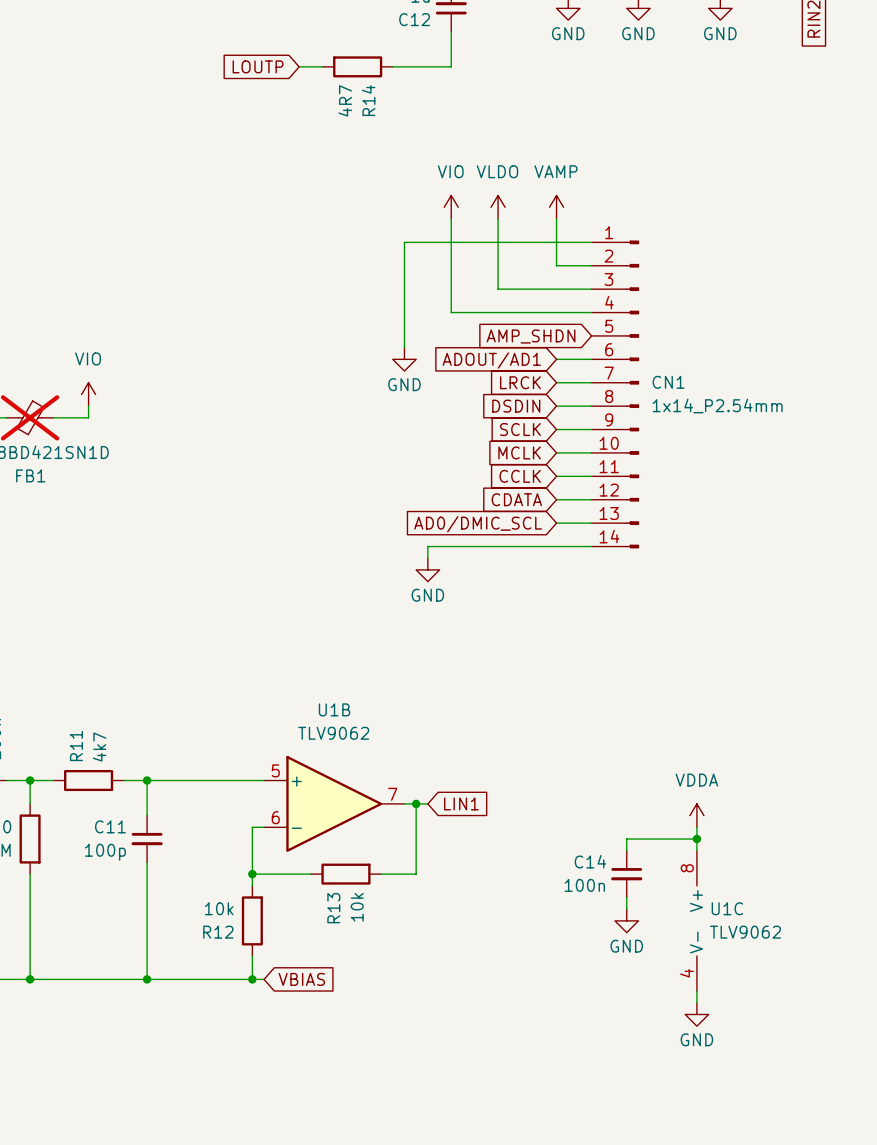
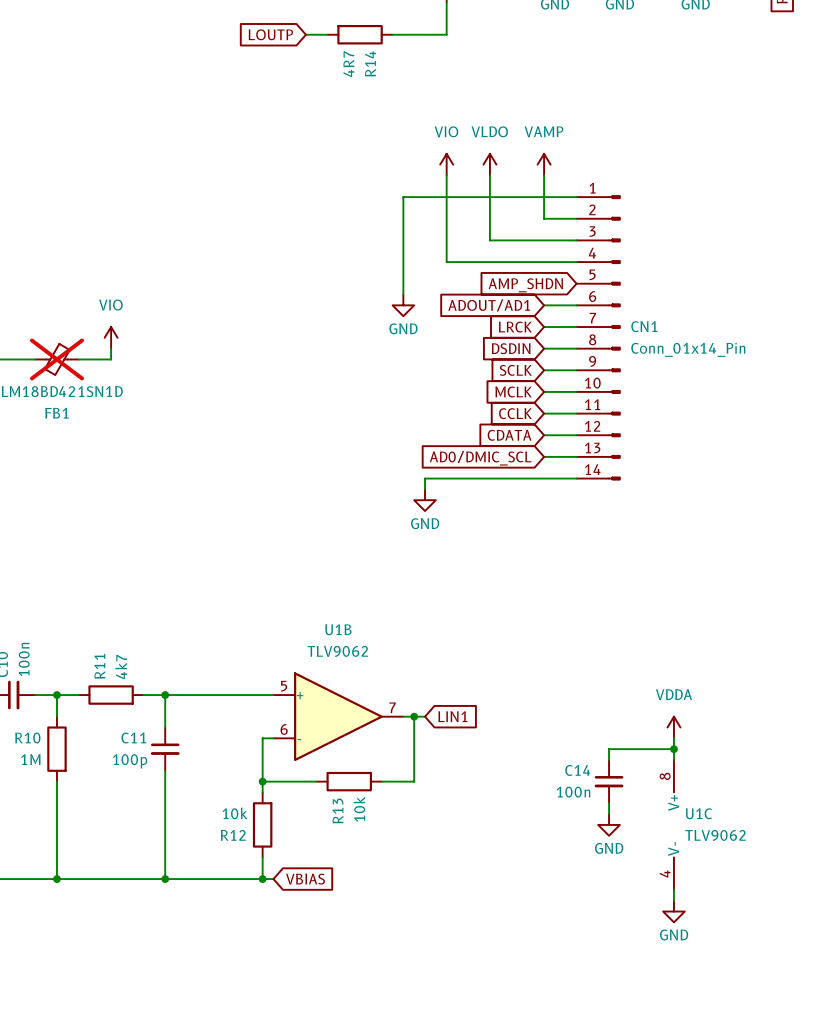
CN1 value: 1x14_P2.54mm (717, 405) -> Conn_01x14_Pin (688, 349)

